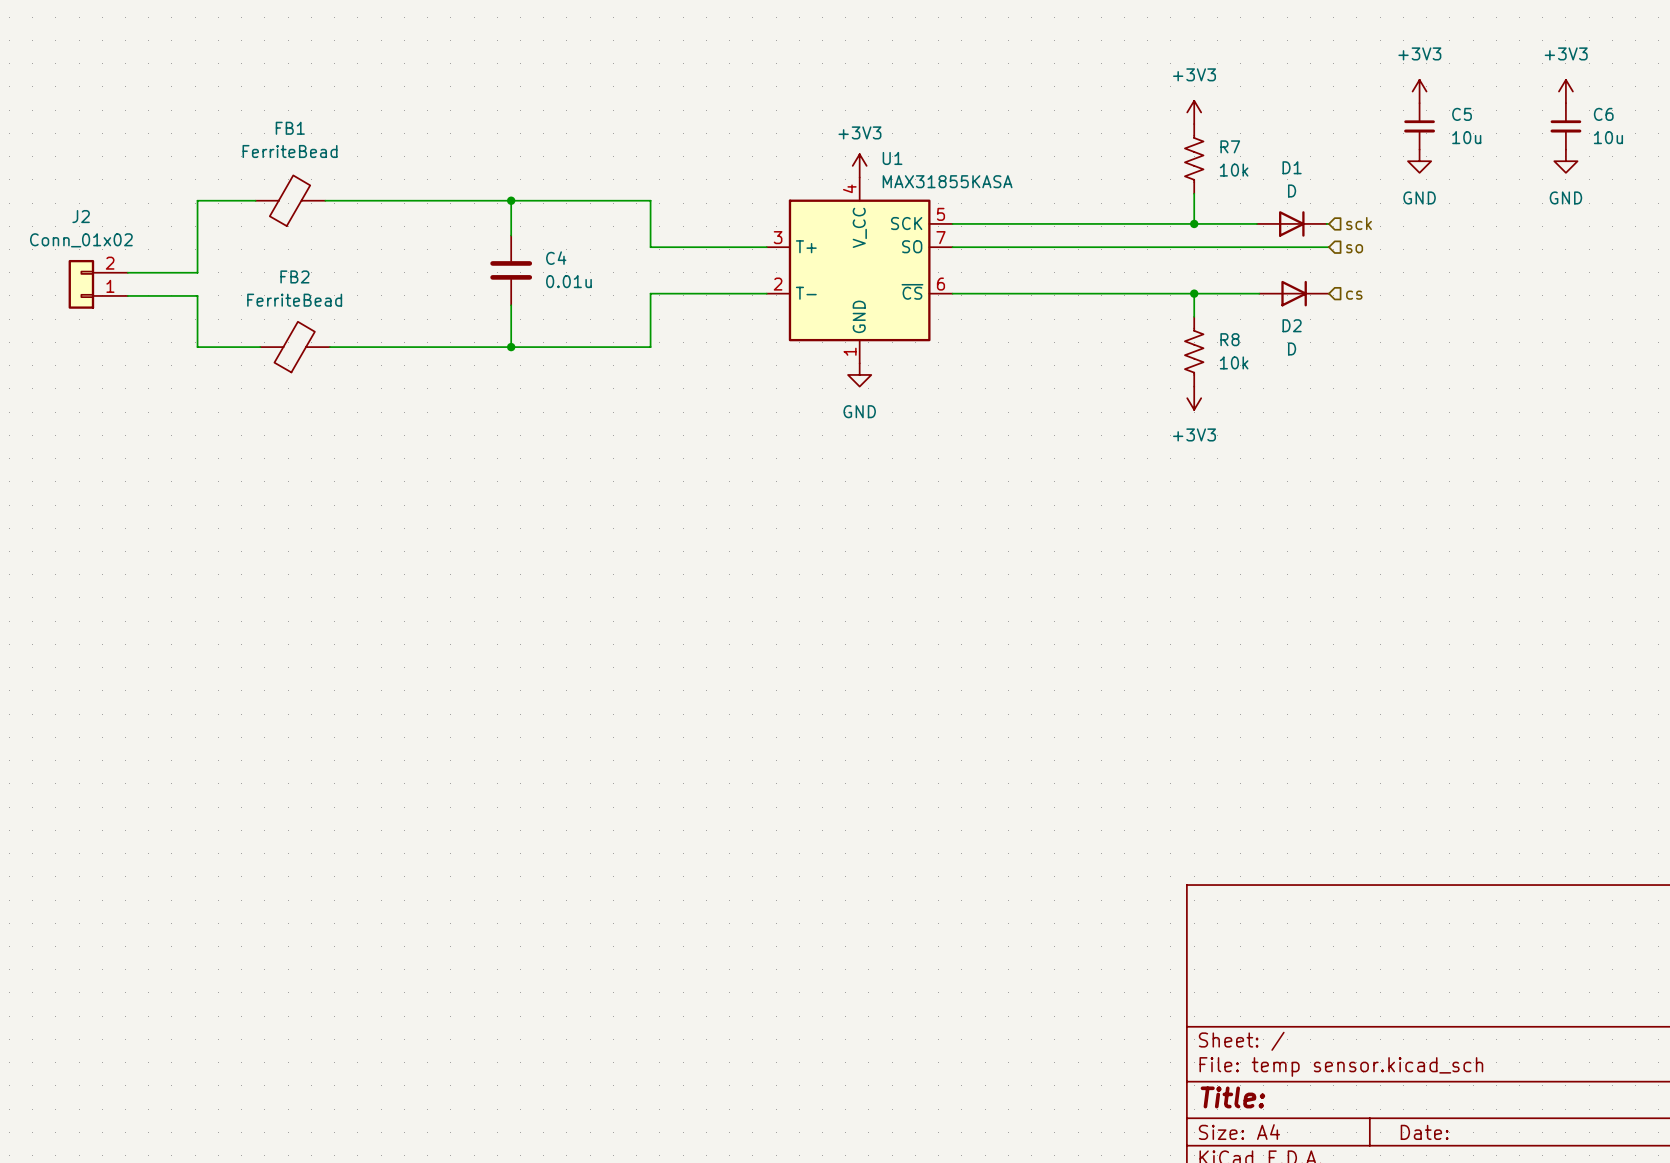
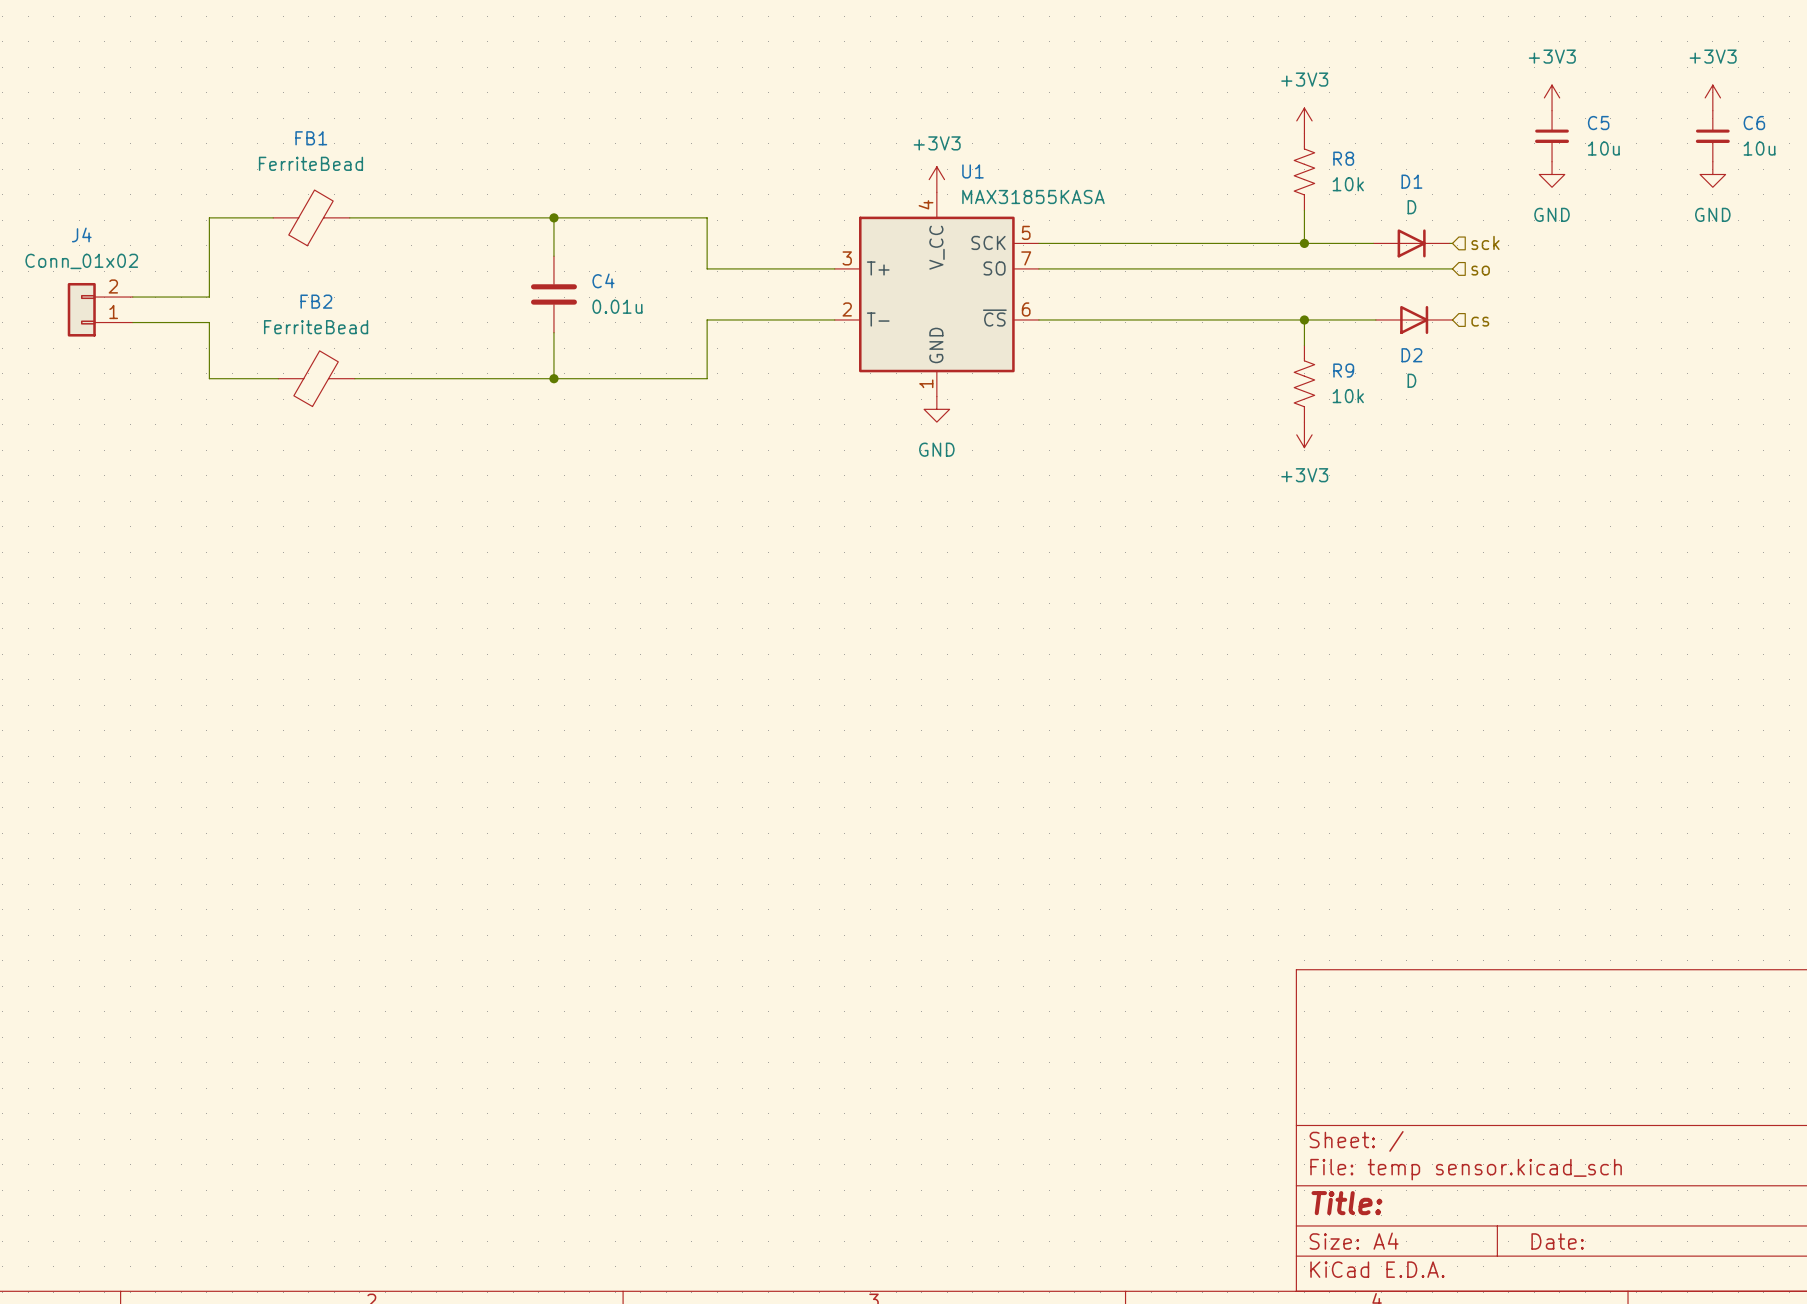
R7 name: R7 (1230, 146) -> R8 (1343, 158)
J2 name: J2 (81, 216) -> J4 (81, 234)
R8 name: R8 (1229, 339) -> R9 (1343, 370)

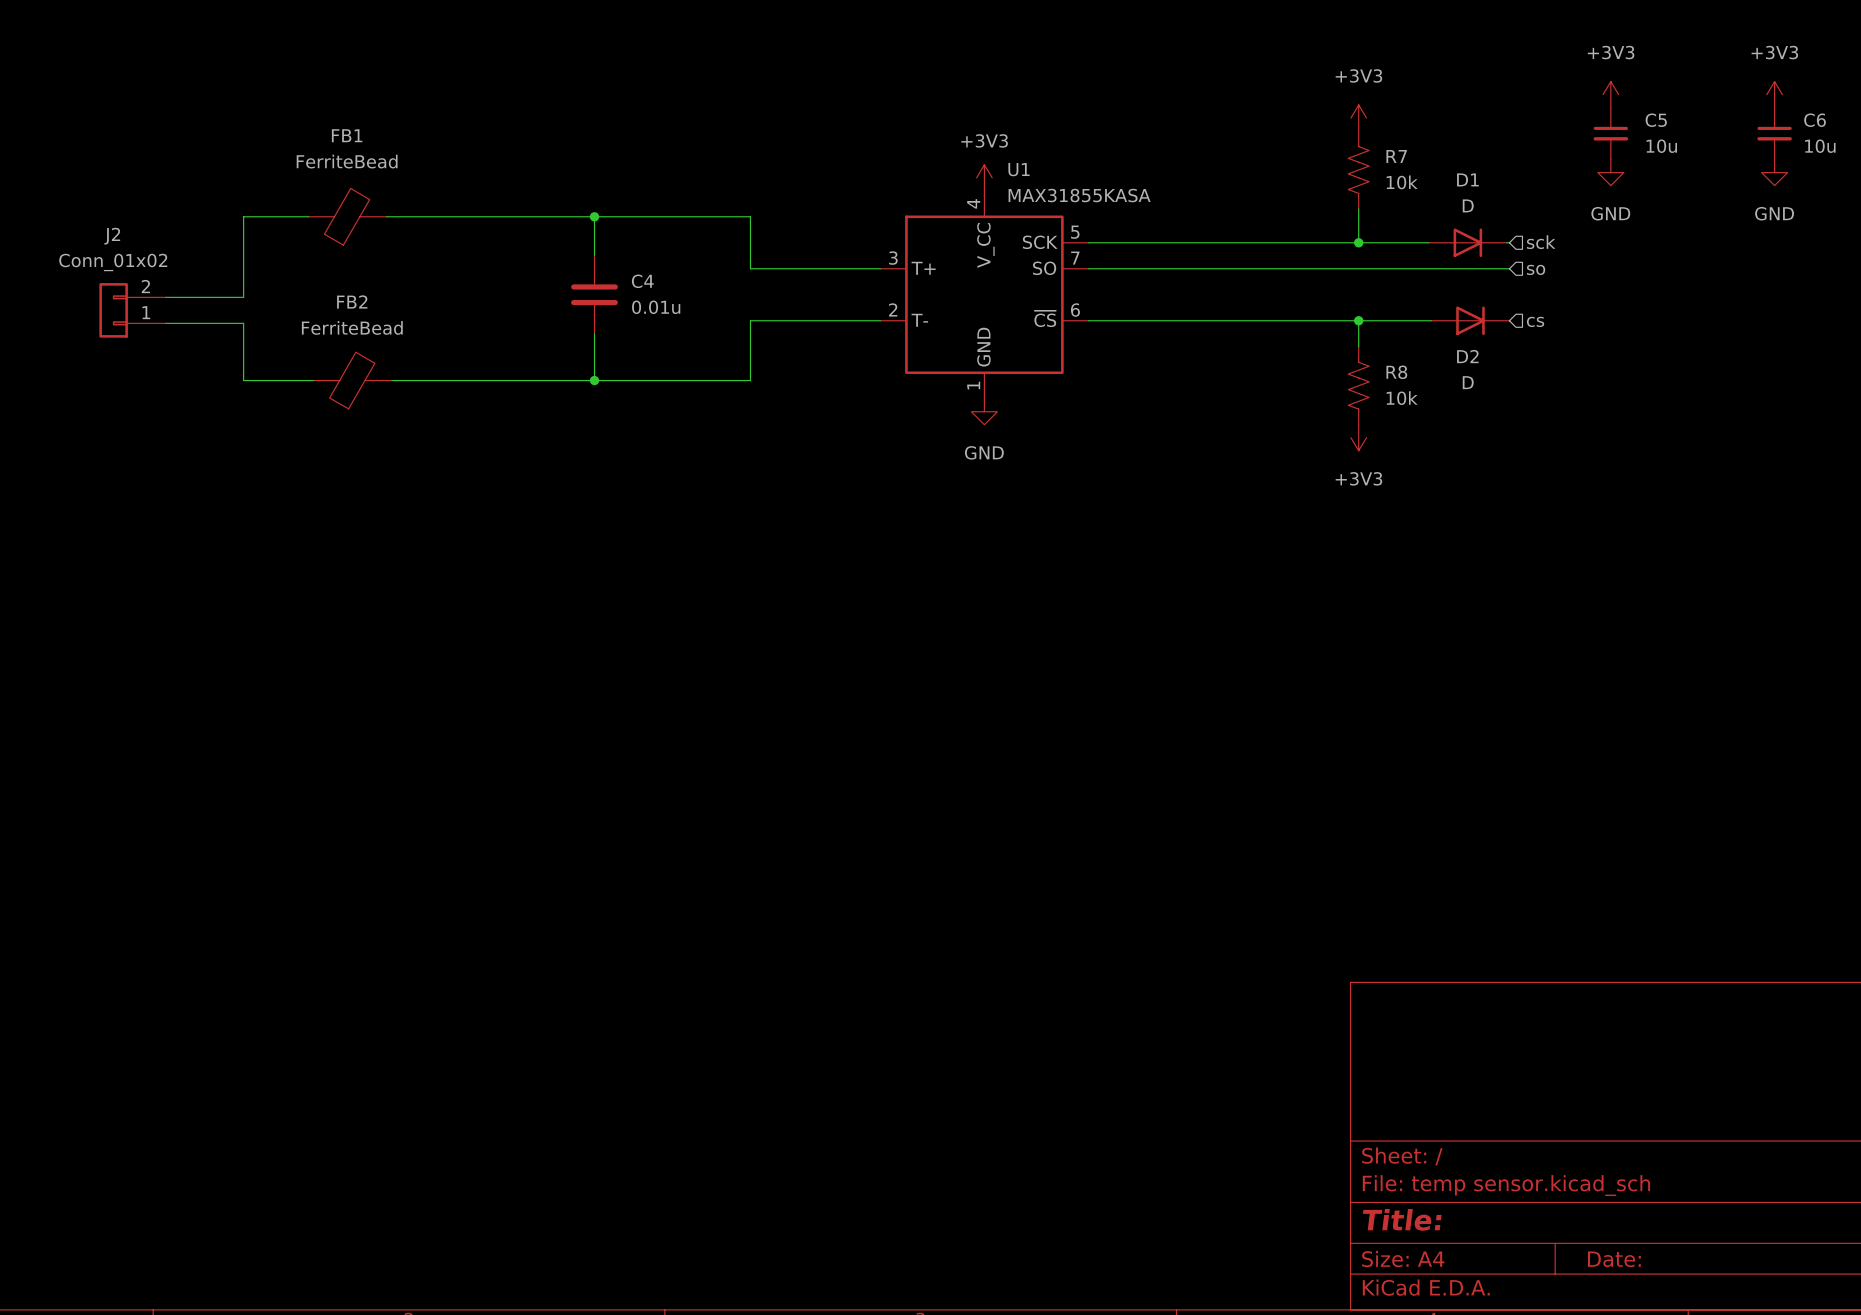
R8 name: R8 (1343, 158) -> R7 (1396, 156)
J4 name: J4 (81, 234) -> J2 (112, 236)
R9 name: R9 (1343, 370) -> R8 (1396, 372)

